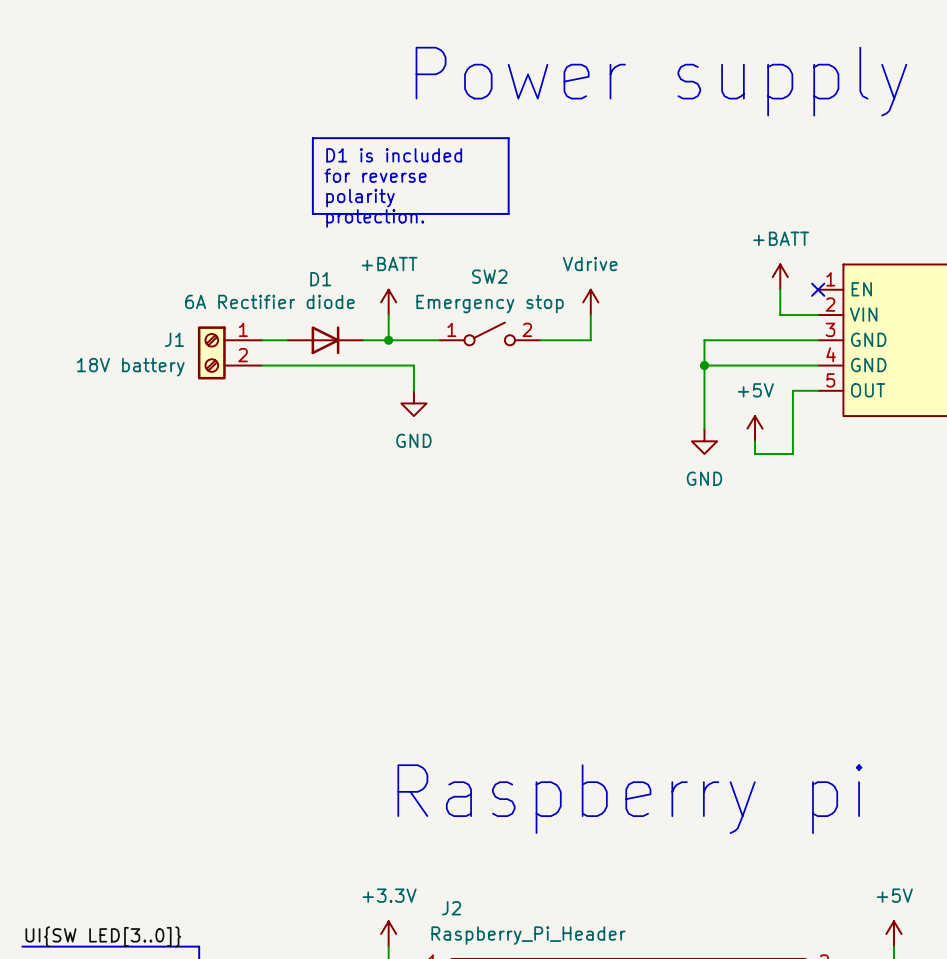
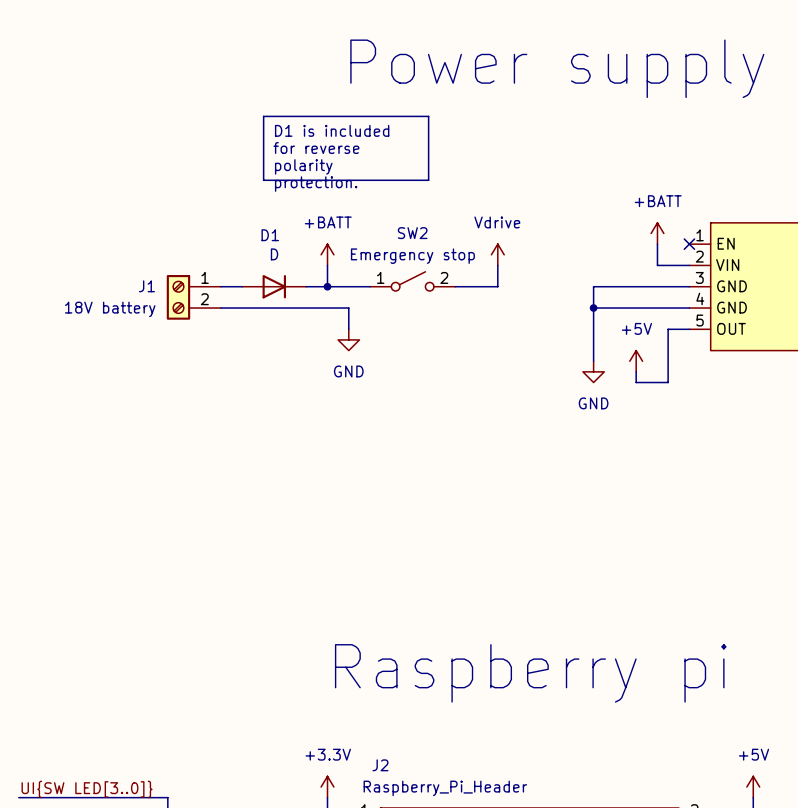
D1 value: 6A Rectifier diode (269, 301) -> D (274, 254)

